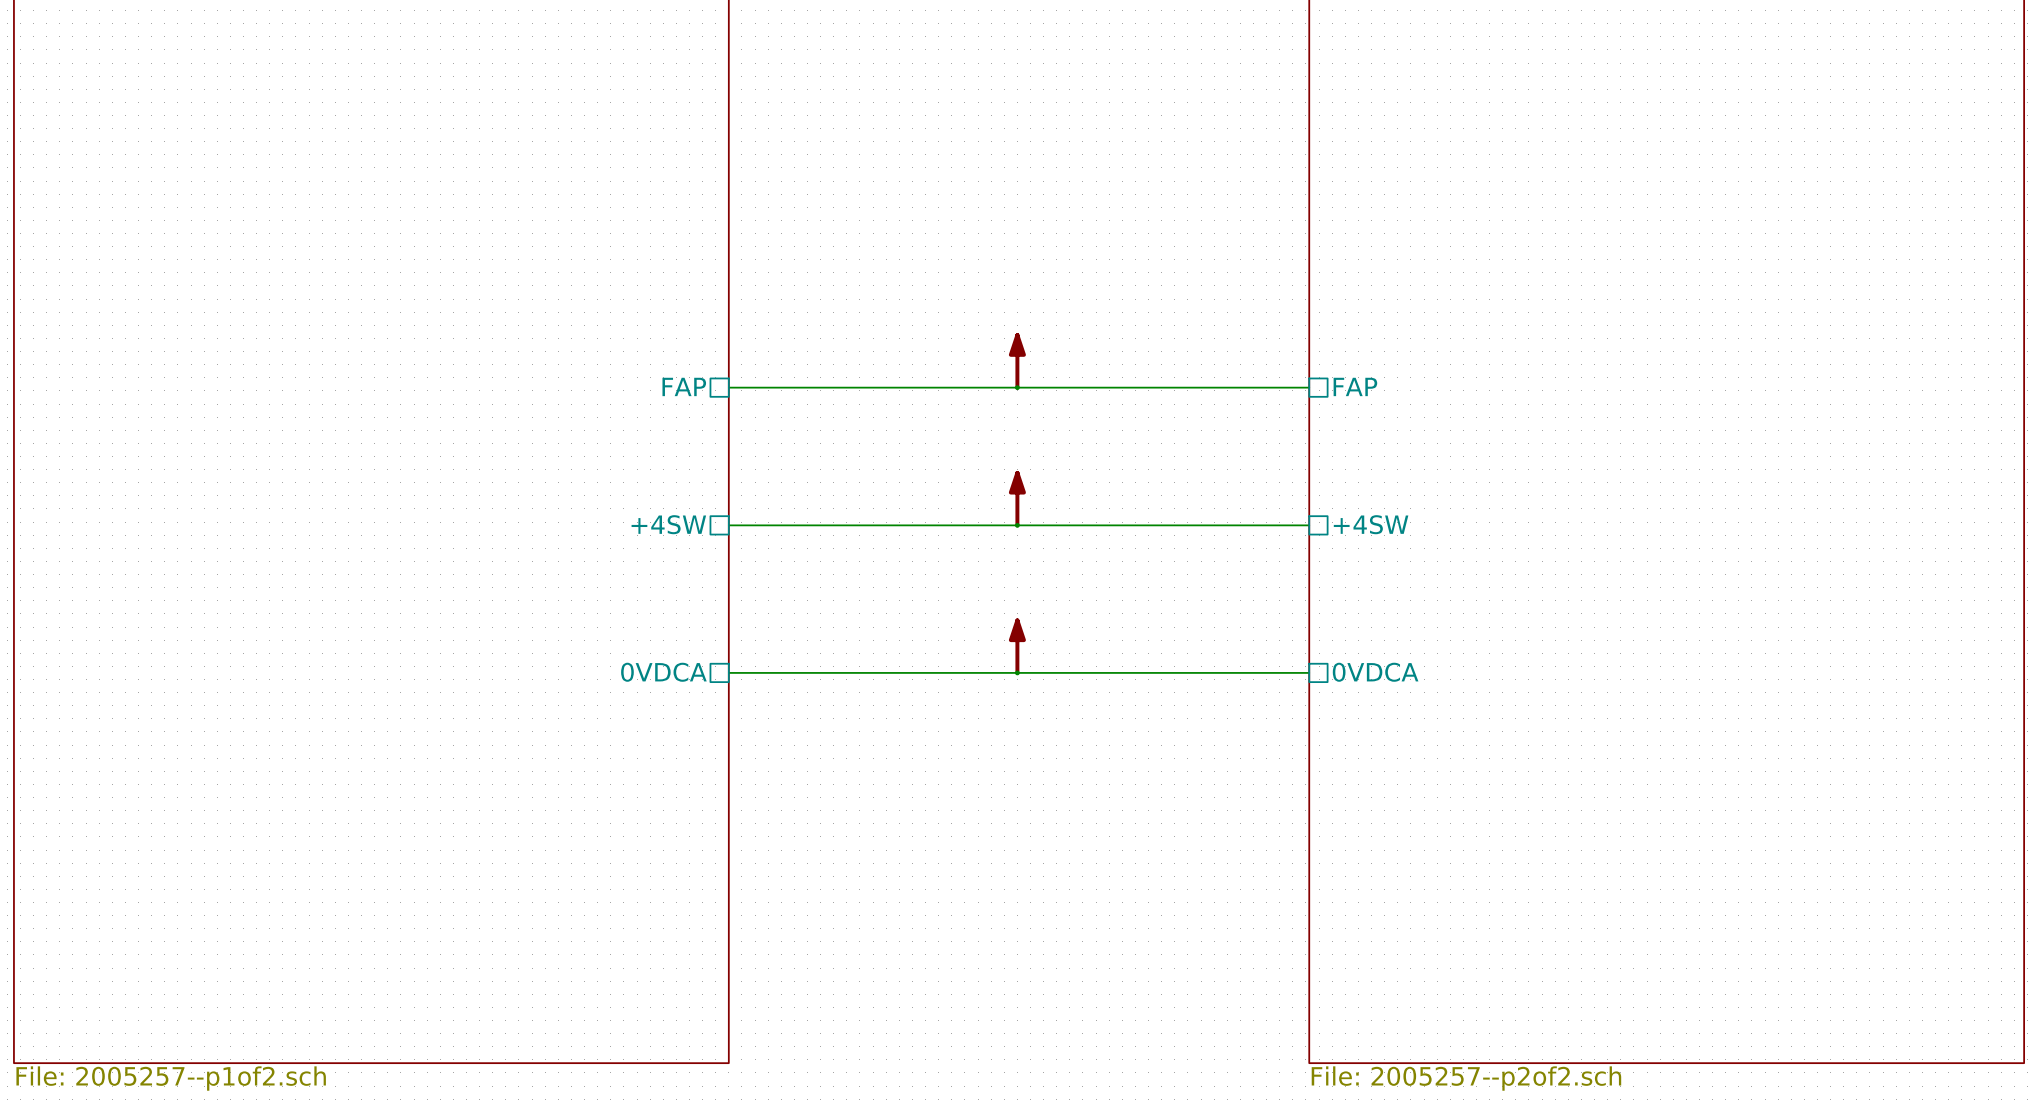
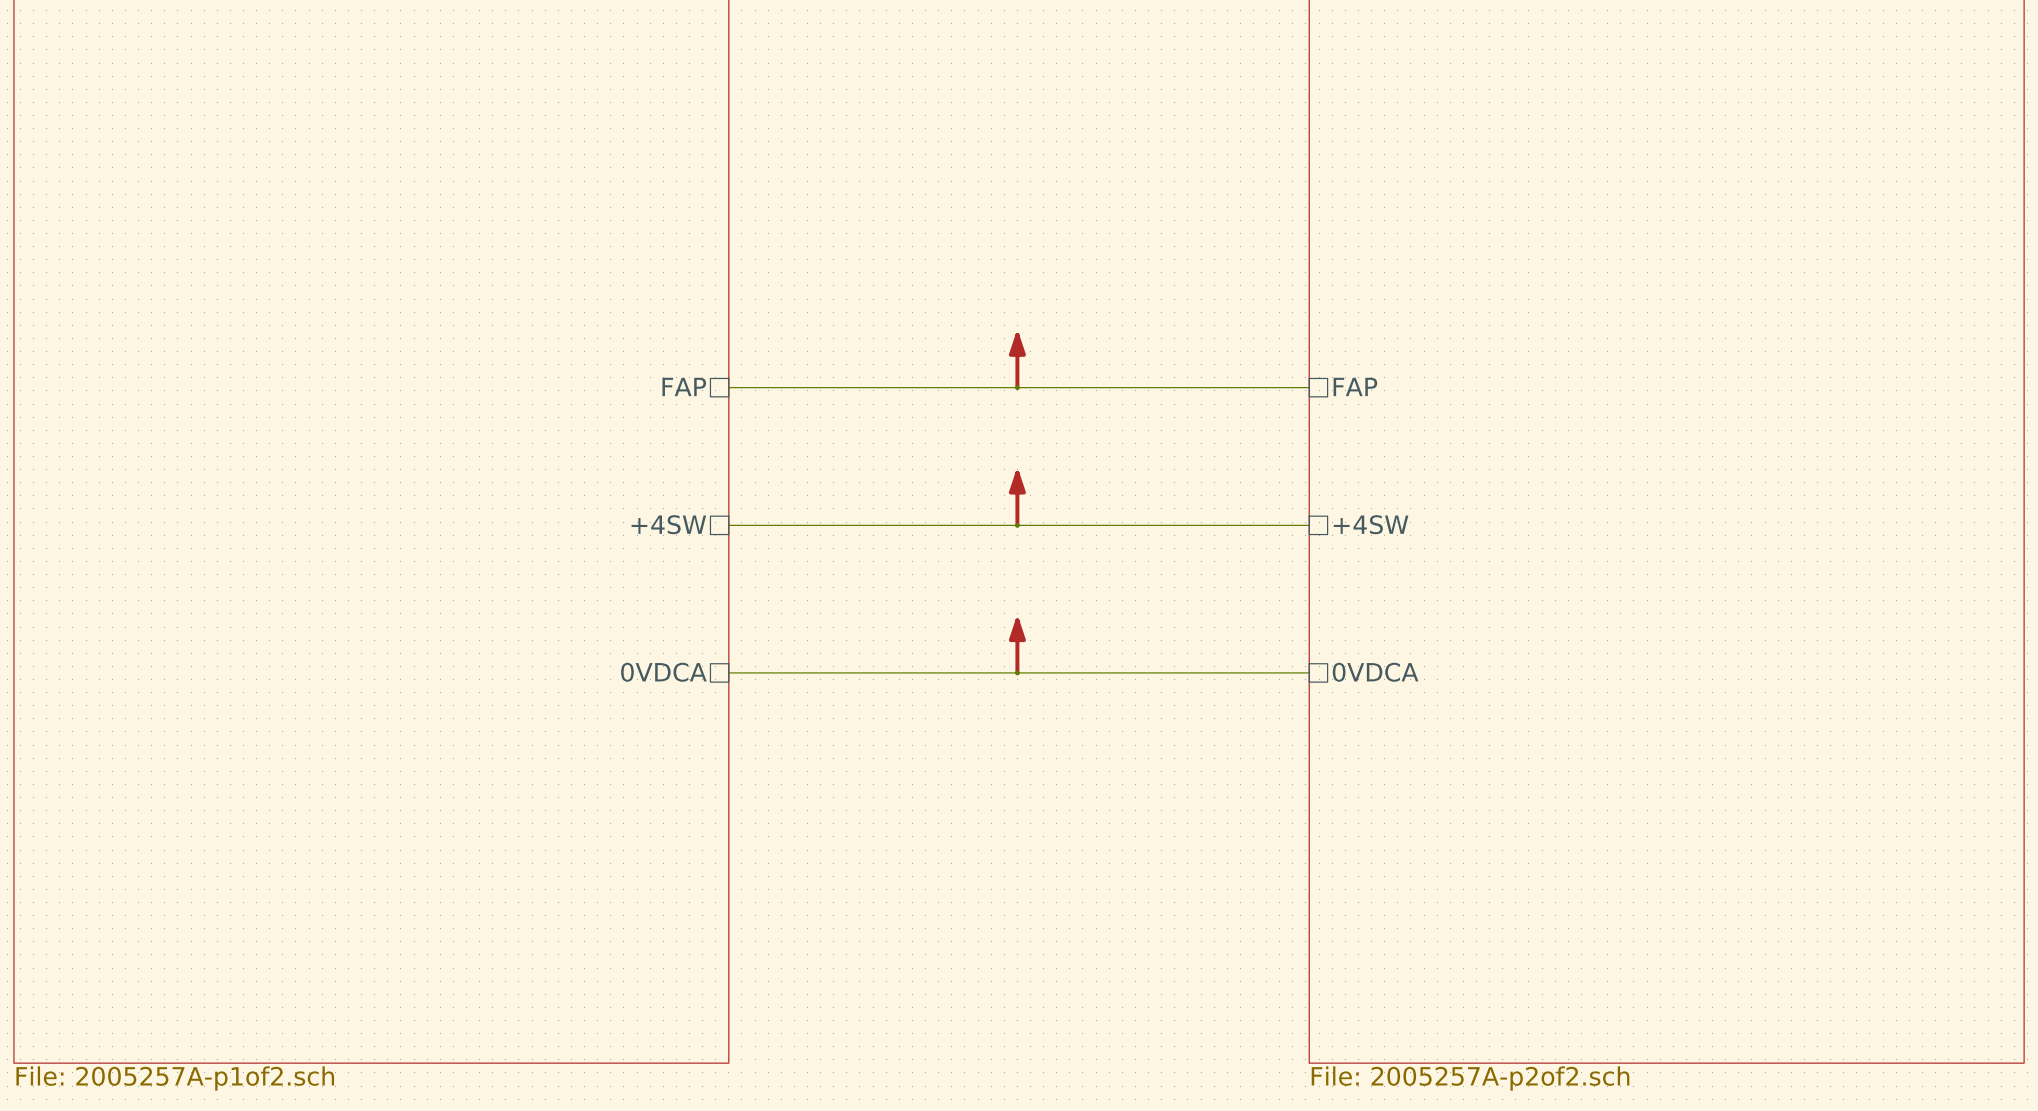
sheet value: File: 2005257--p1of2.sch (171, 1078) -> File: 2005257A-p1of2.sch (175, 1078)
sheet value: File: 2005257--p2of2.sch (1466, 1078) -> File: 2005257A-p2of2.sch (1470, 1078)

